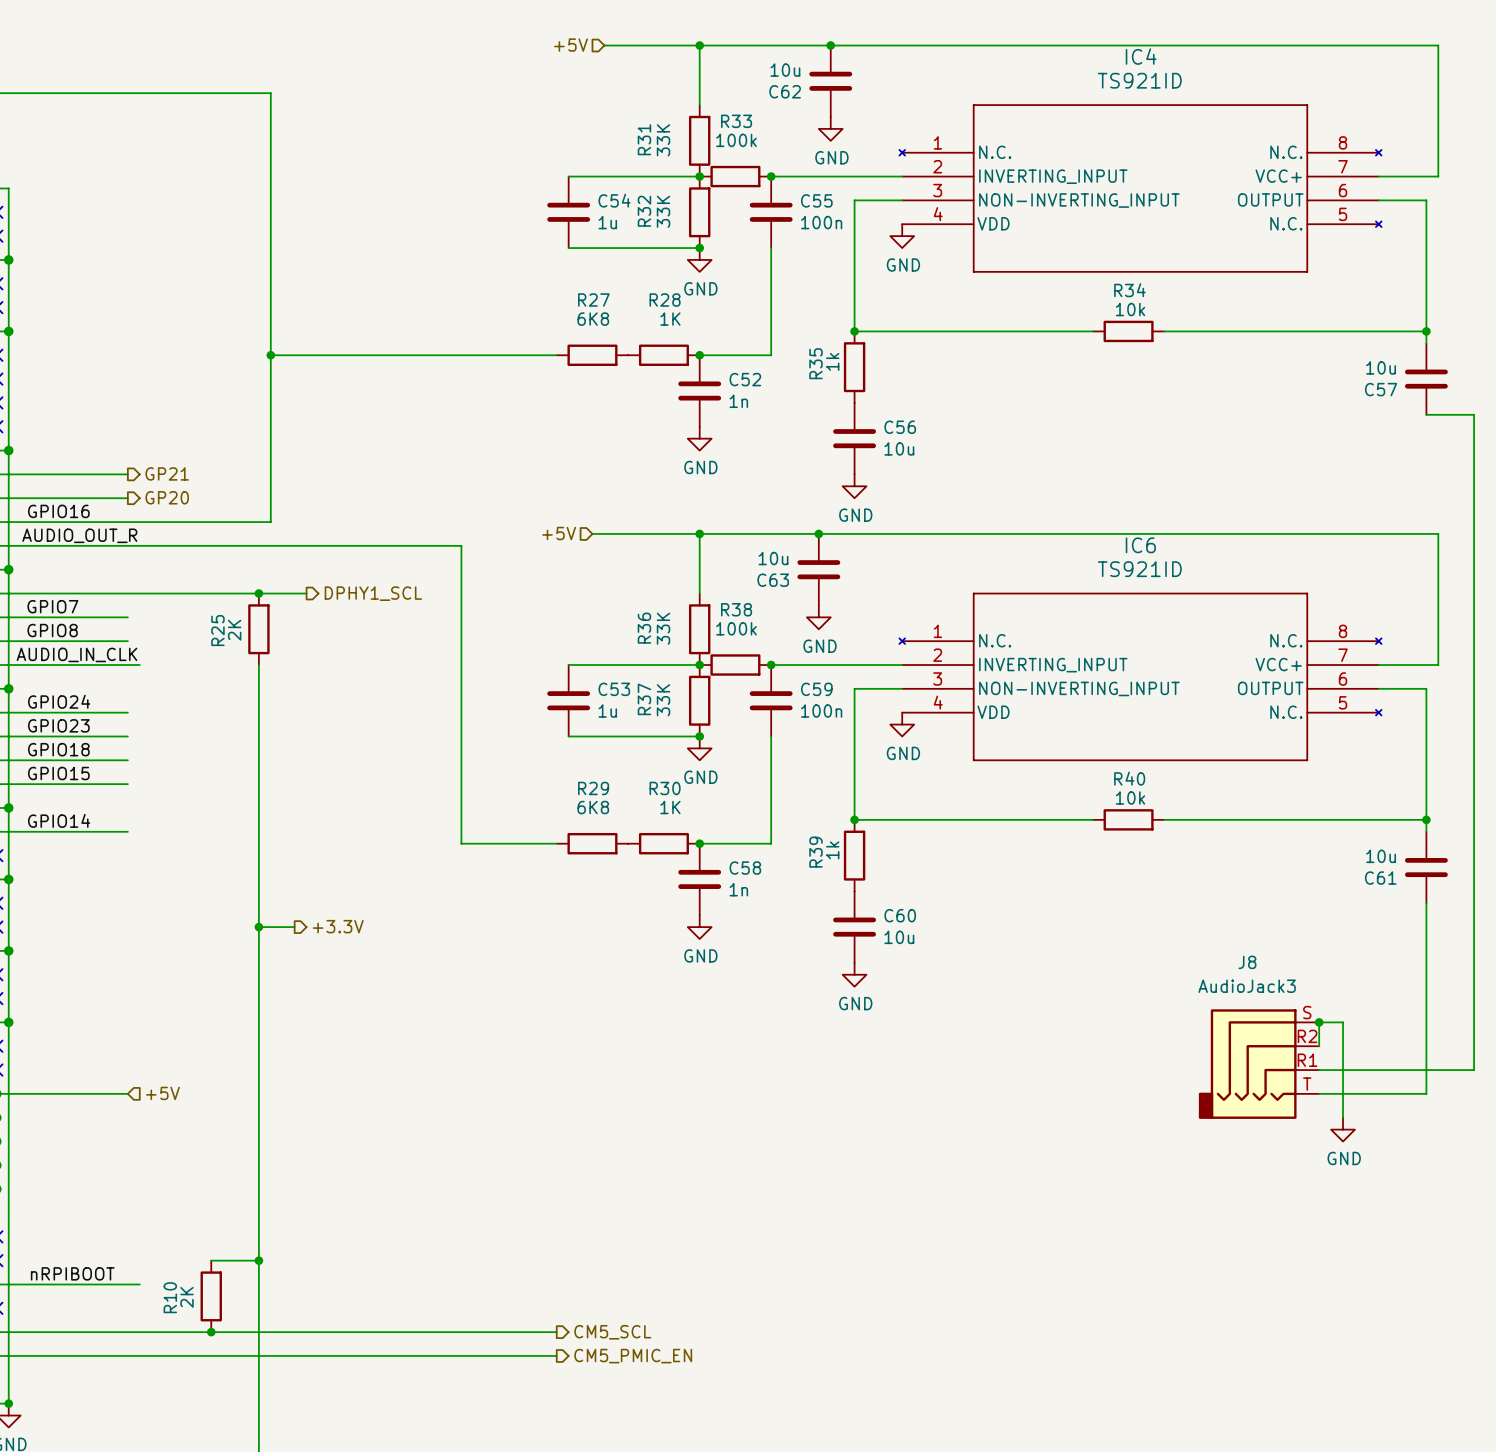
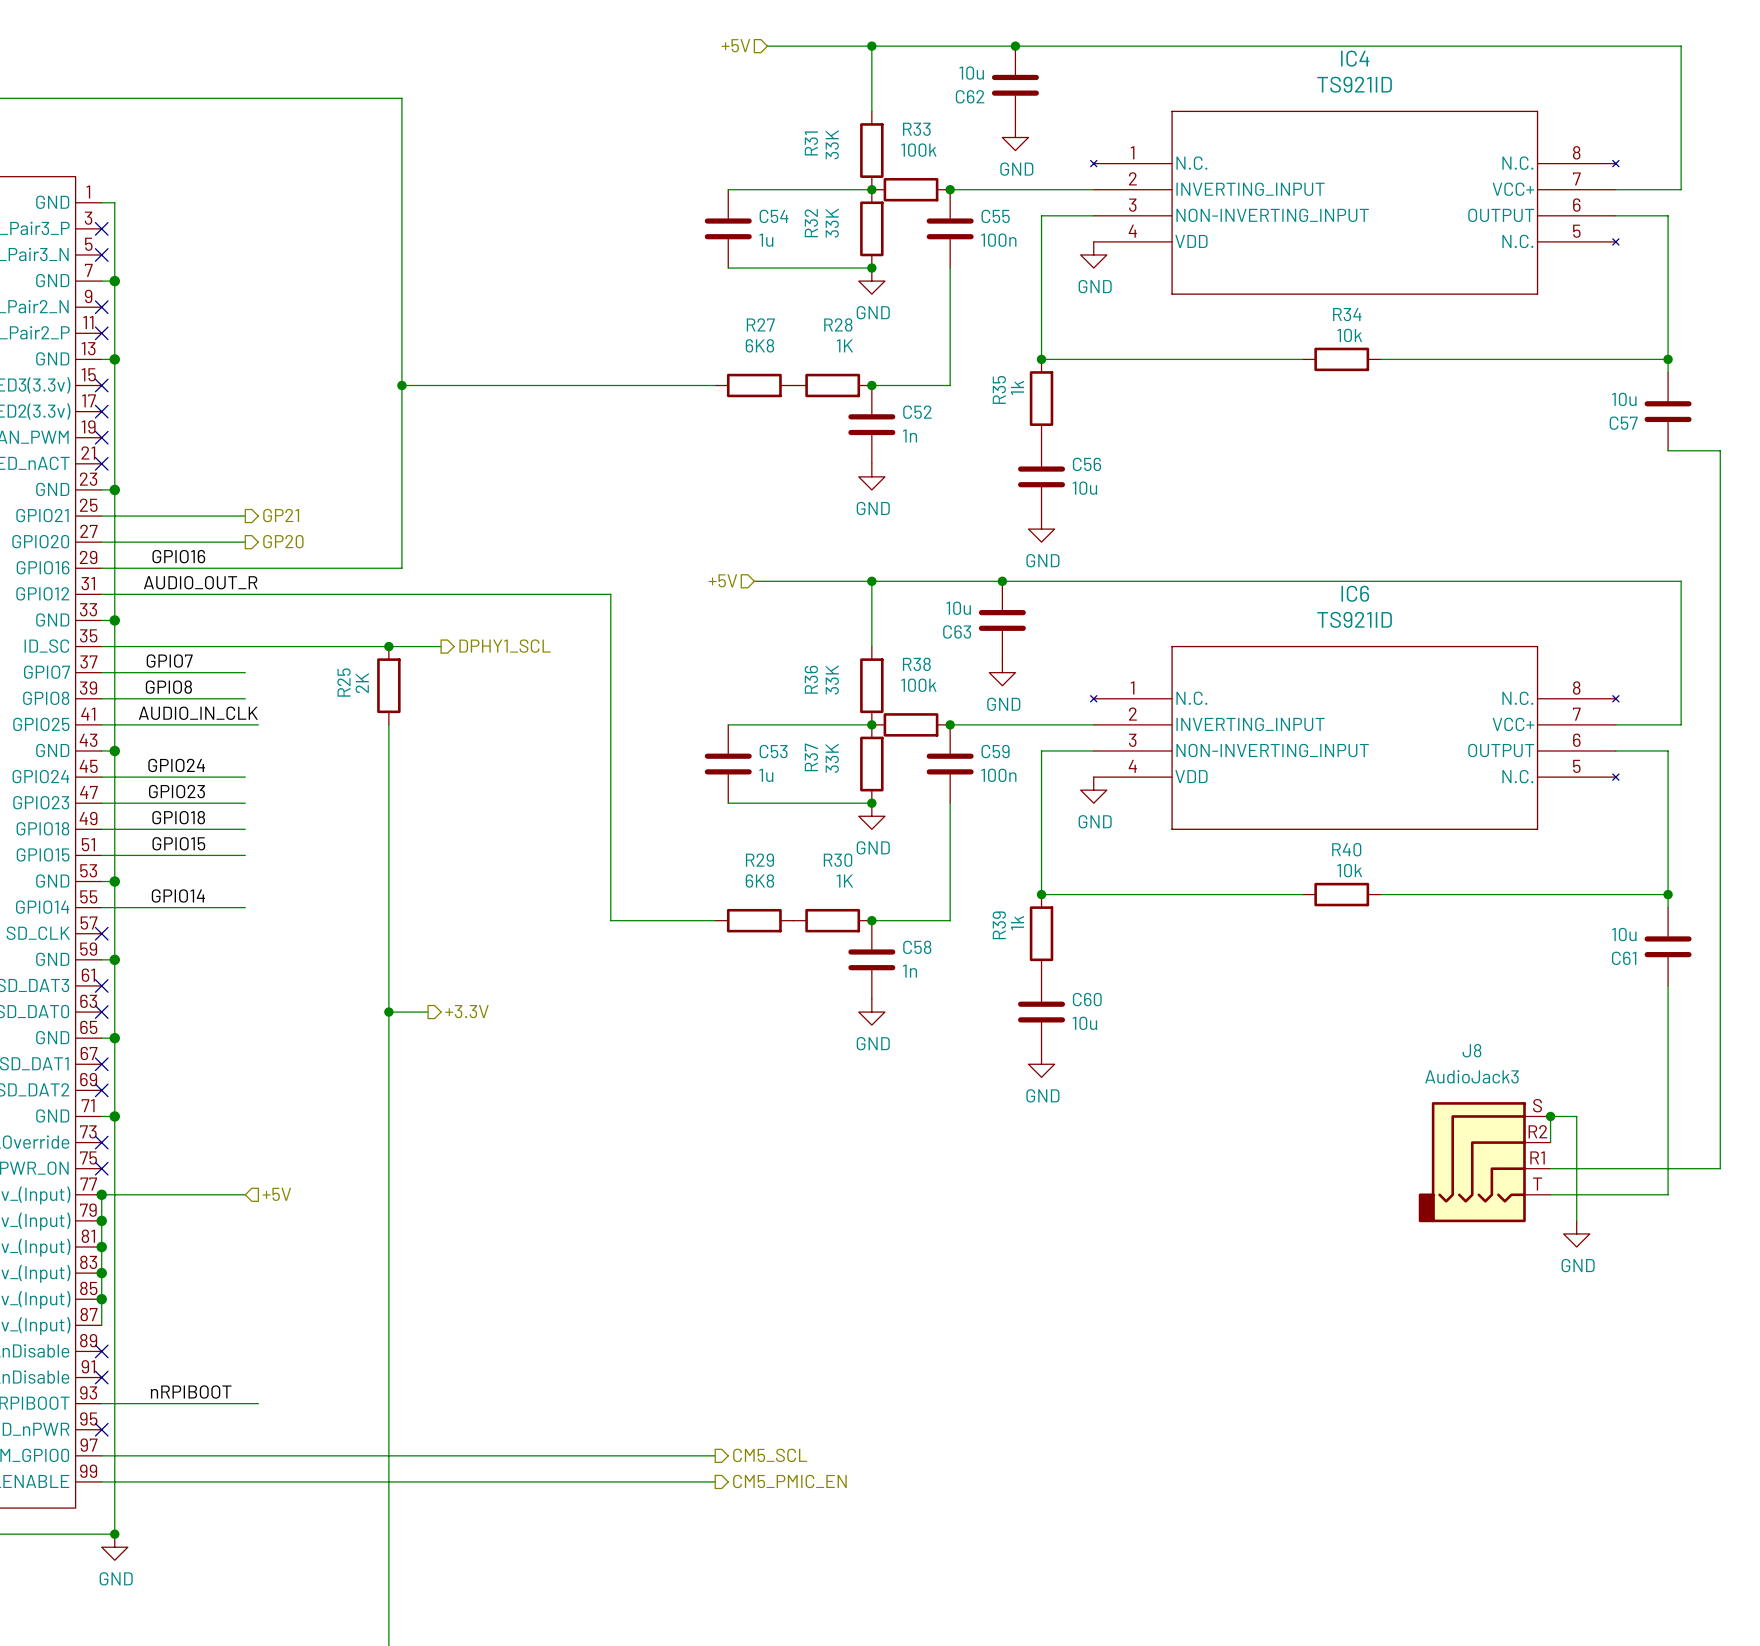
wire: (211, 1260) (258, 1260) -> none
junction: (258, 1260) -> none
R10: 2K (211, 1296) -> none
junction: (211, 1332) -> none

